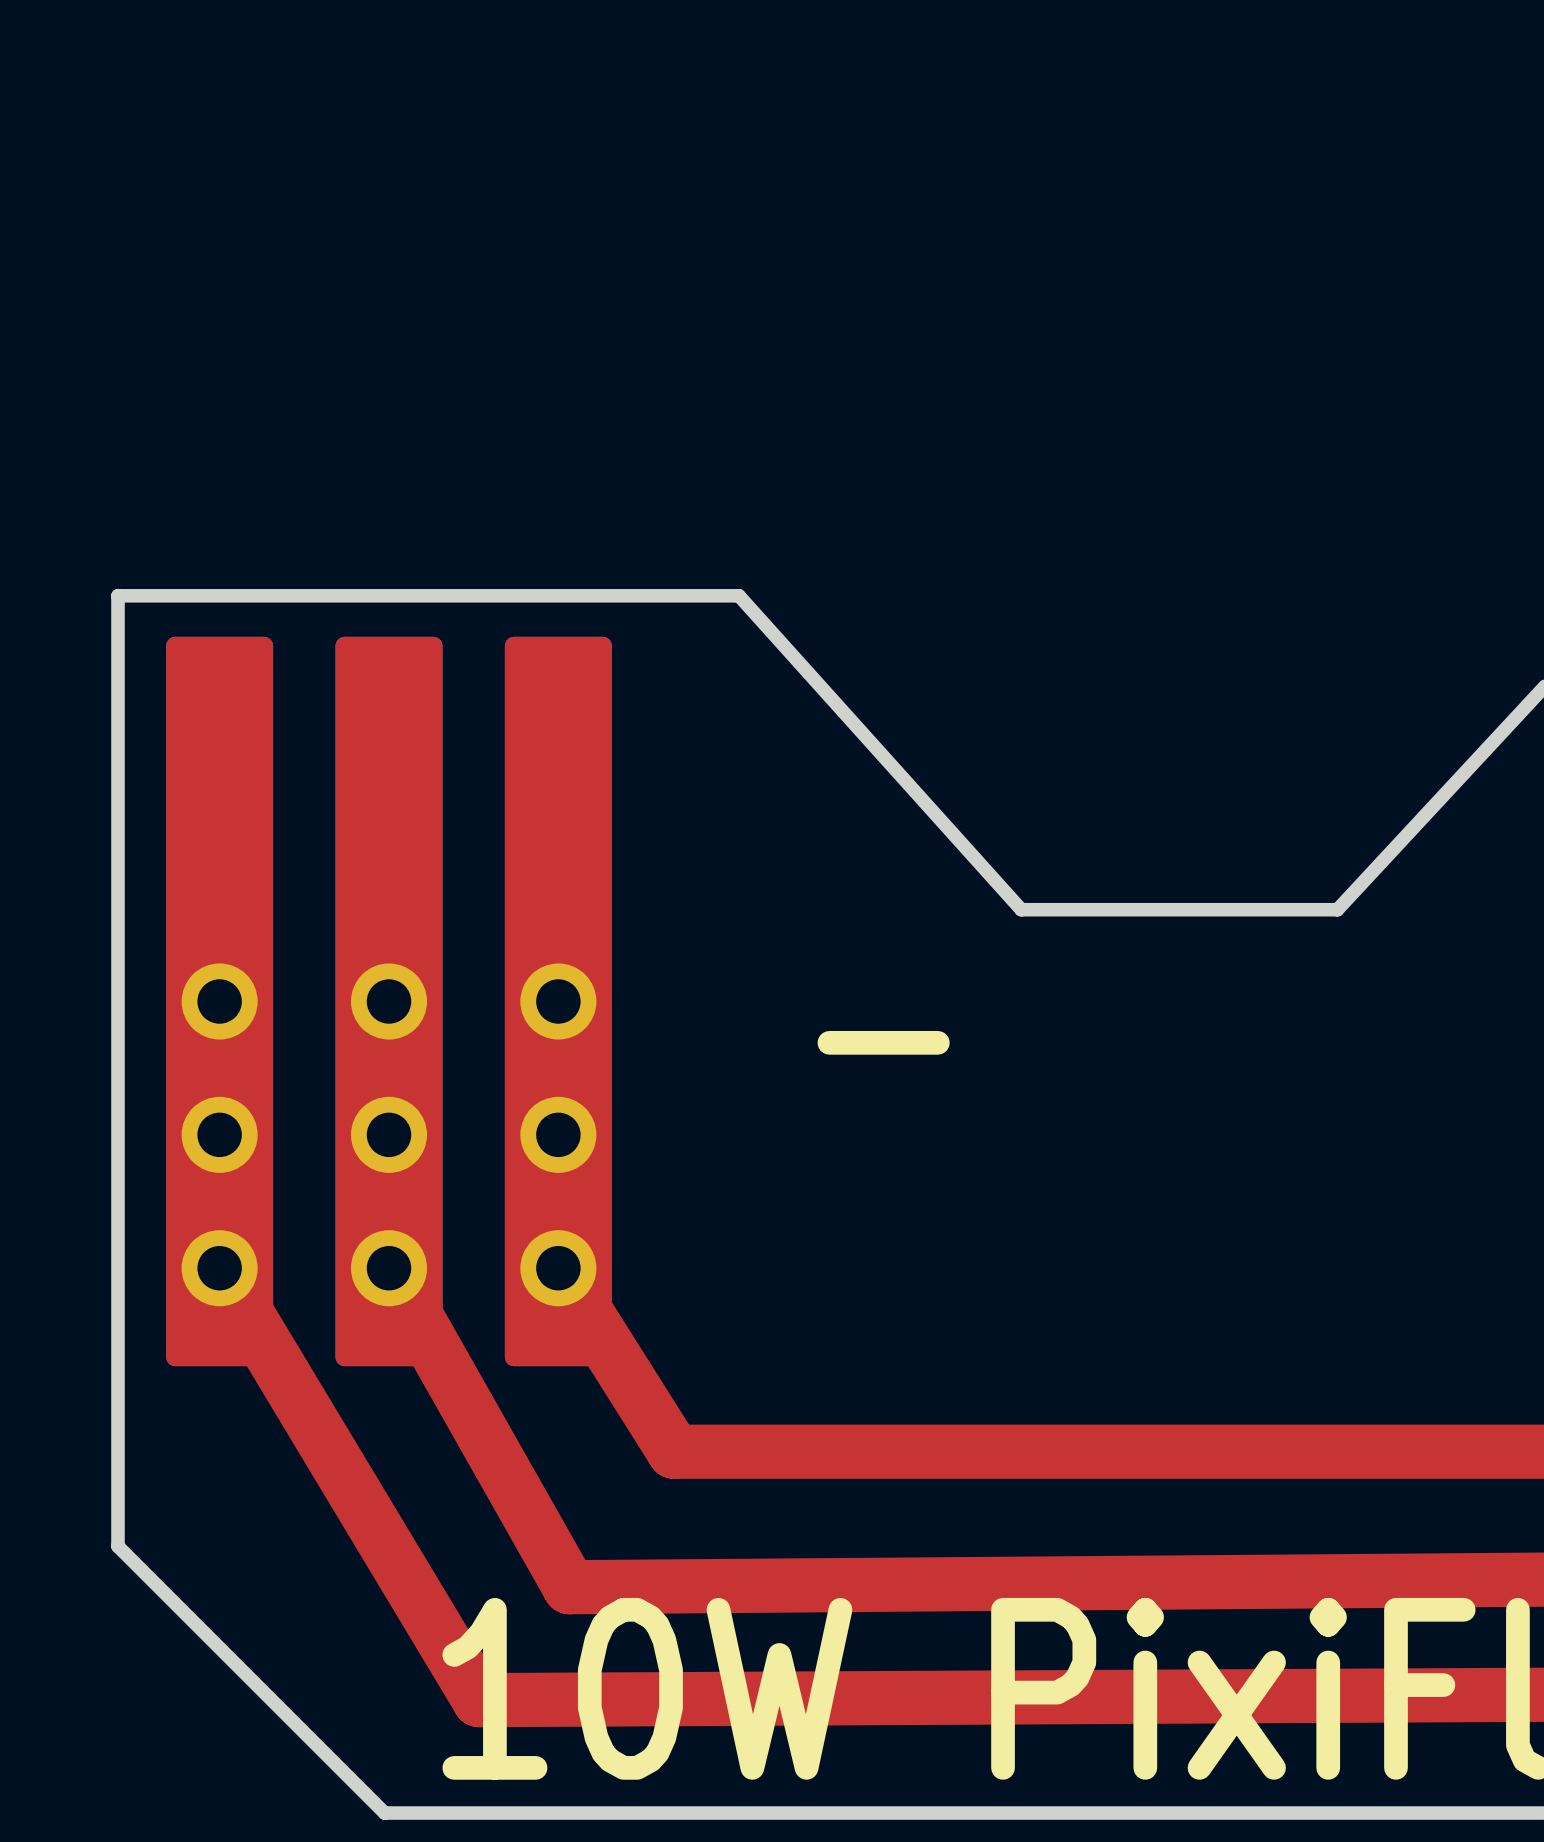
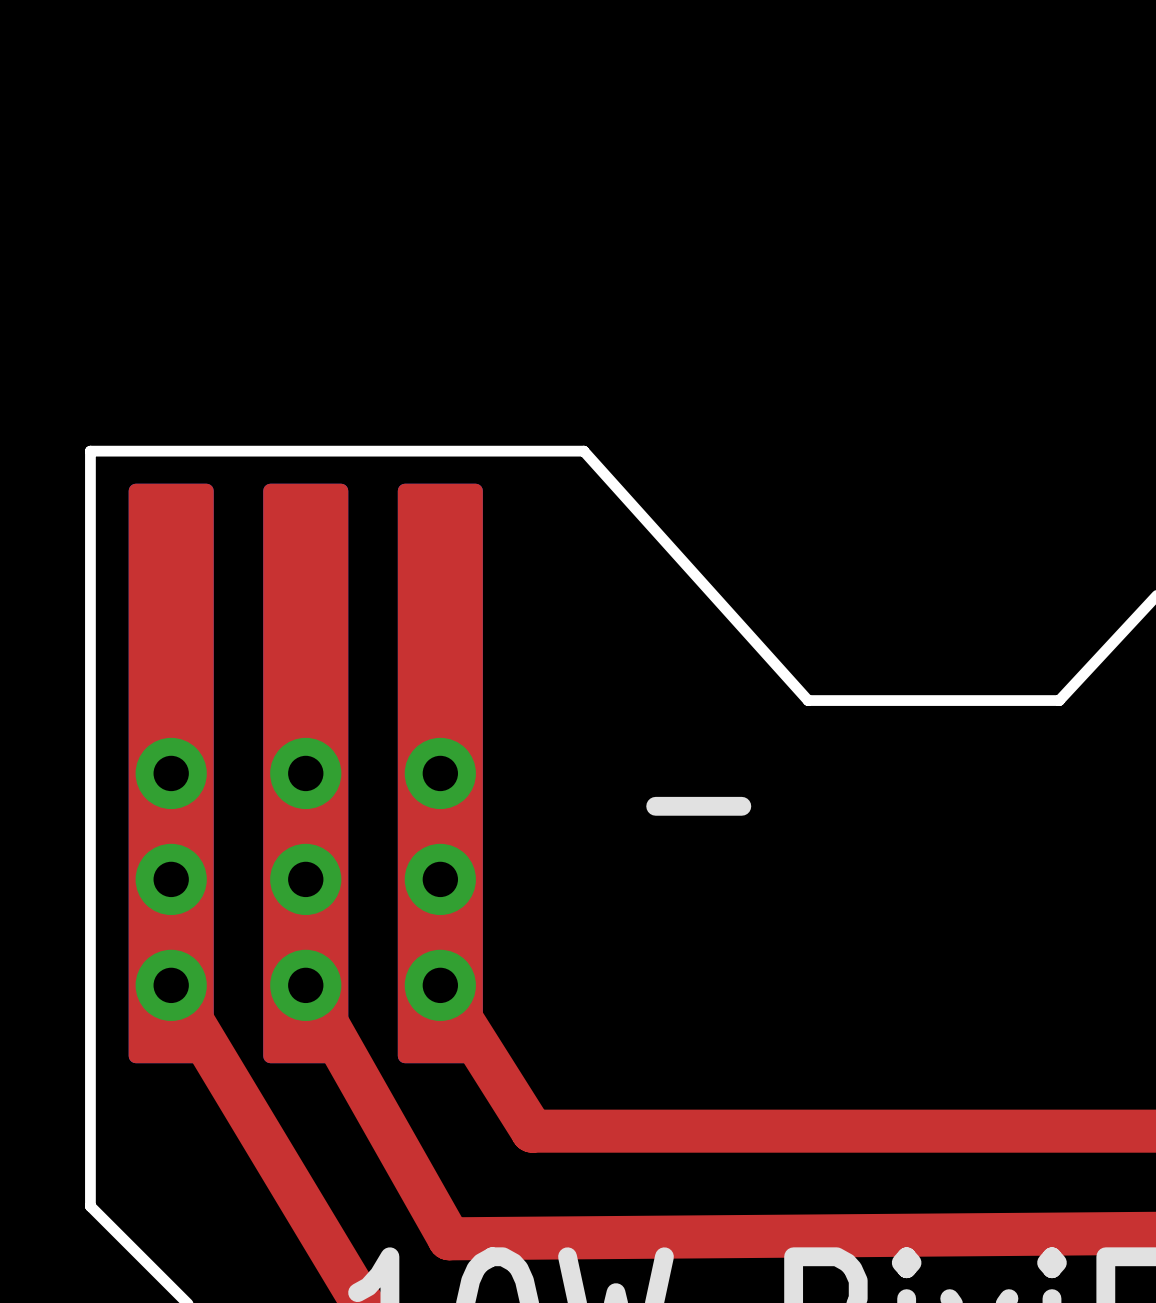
part footprint: [166, 636, 274, 1367] -> [128, 483, 214, 1064]
part footprint: [335, 636, 443, 1367] -> [263, 483, 349, 1064]
part footprint: [504, 636, 612, 1367] -> [397, 483, 483, 1064]

